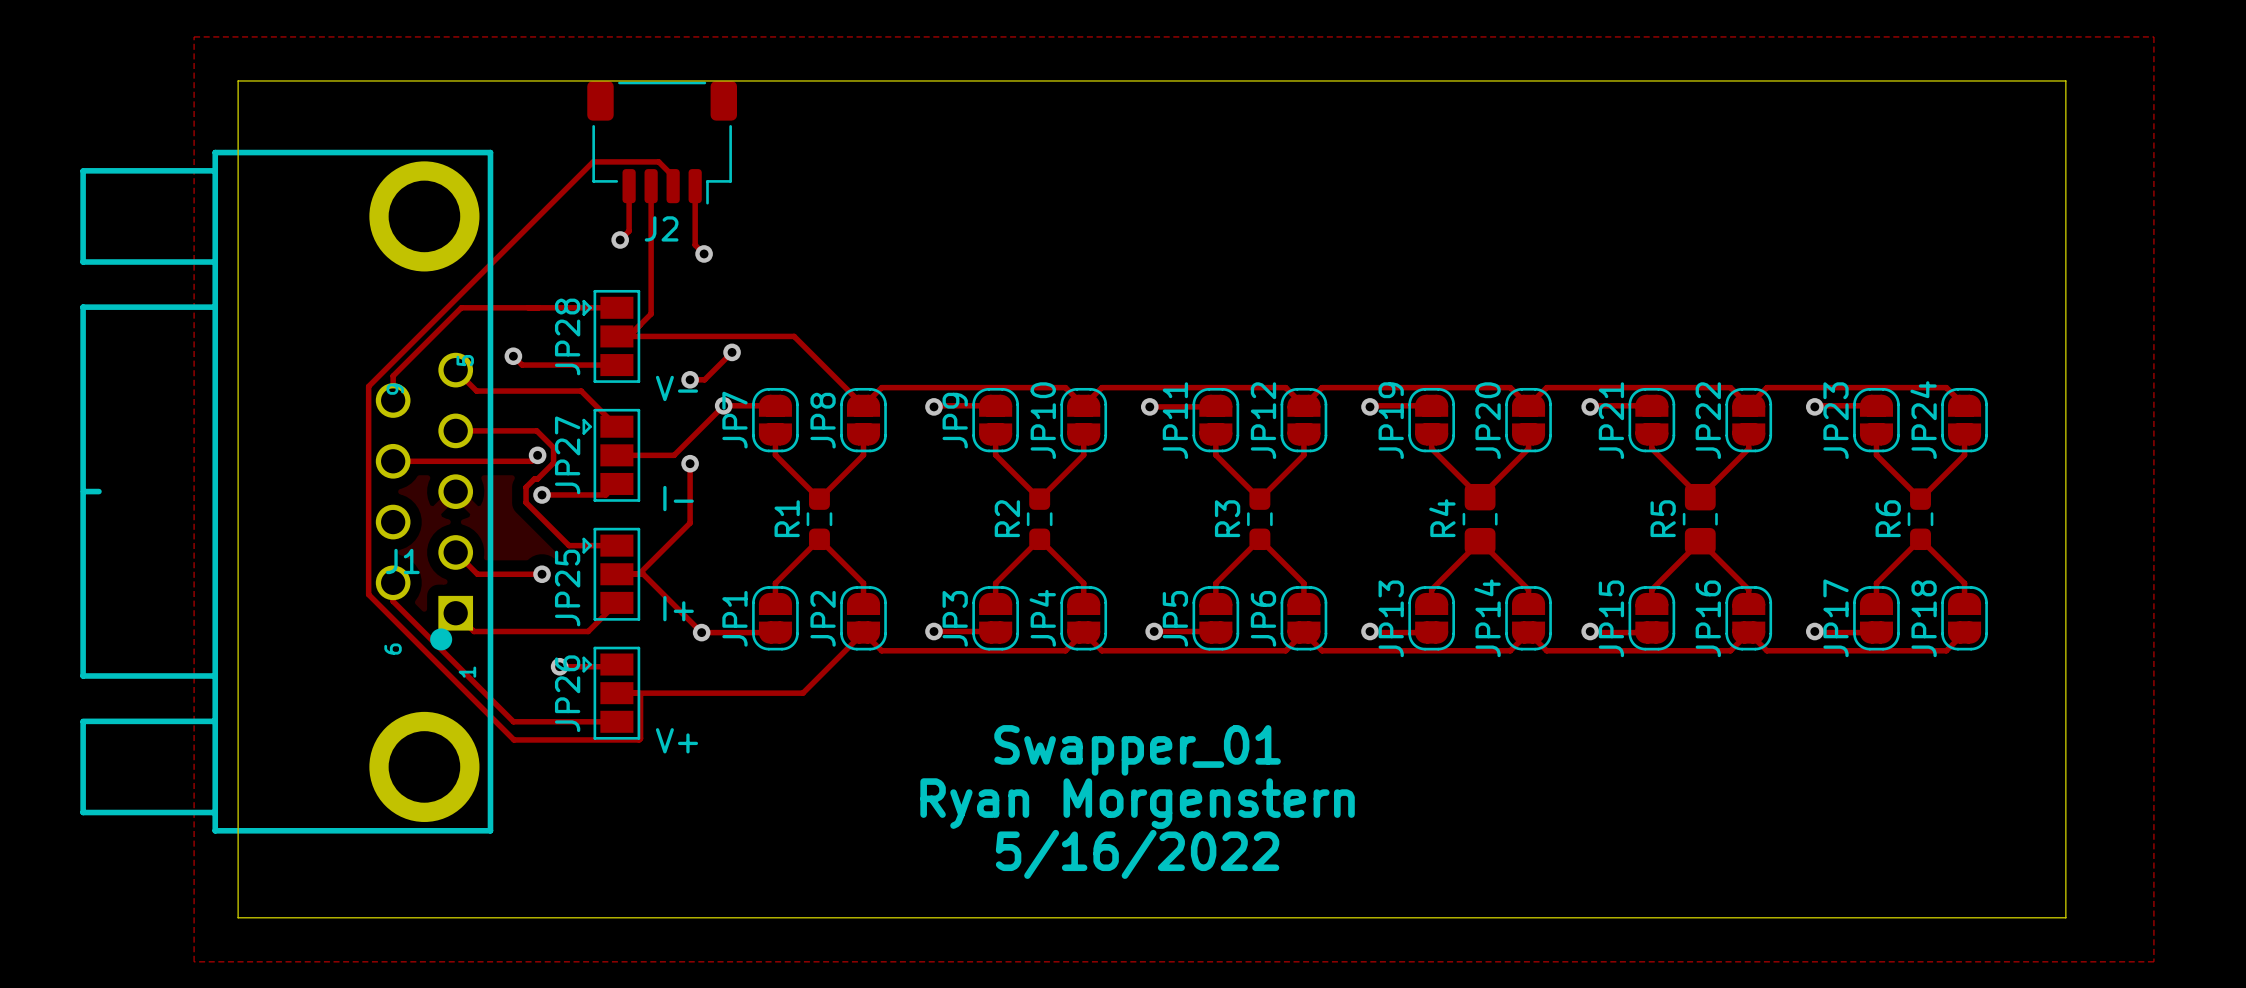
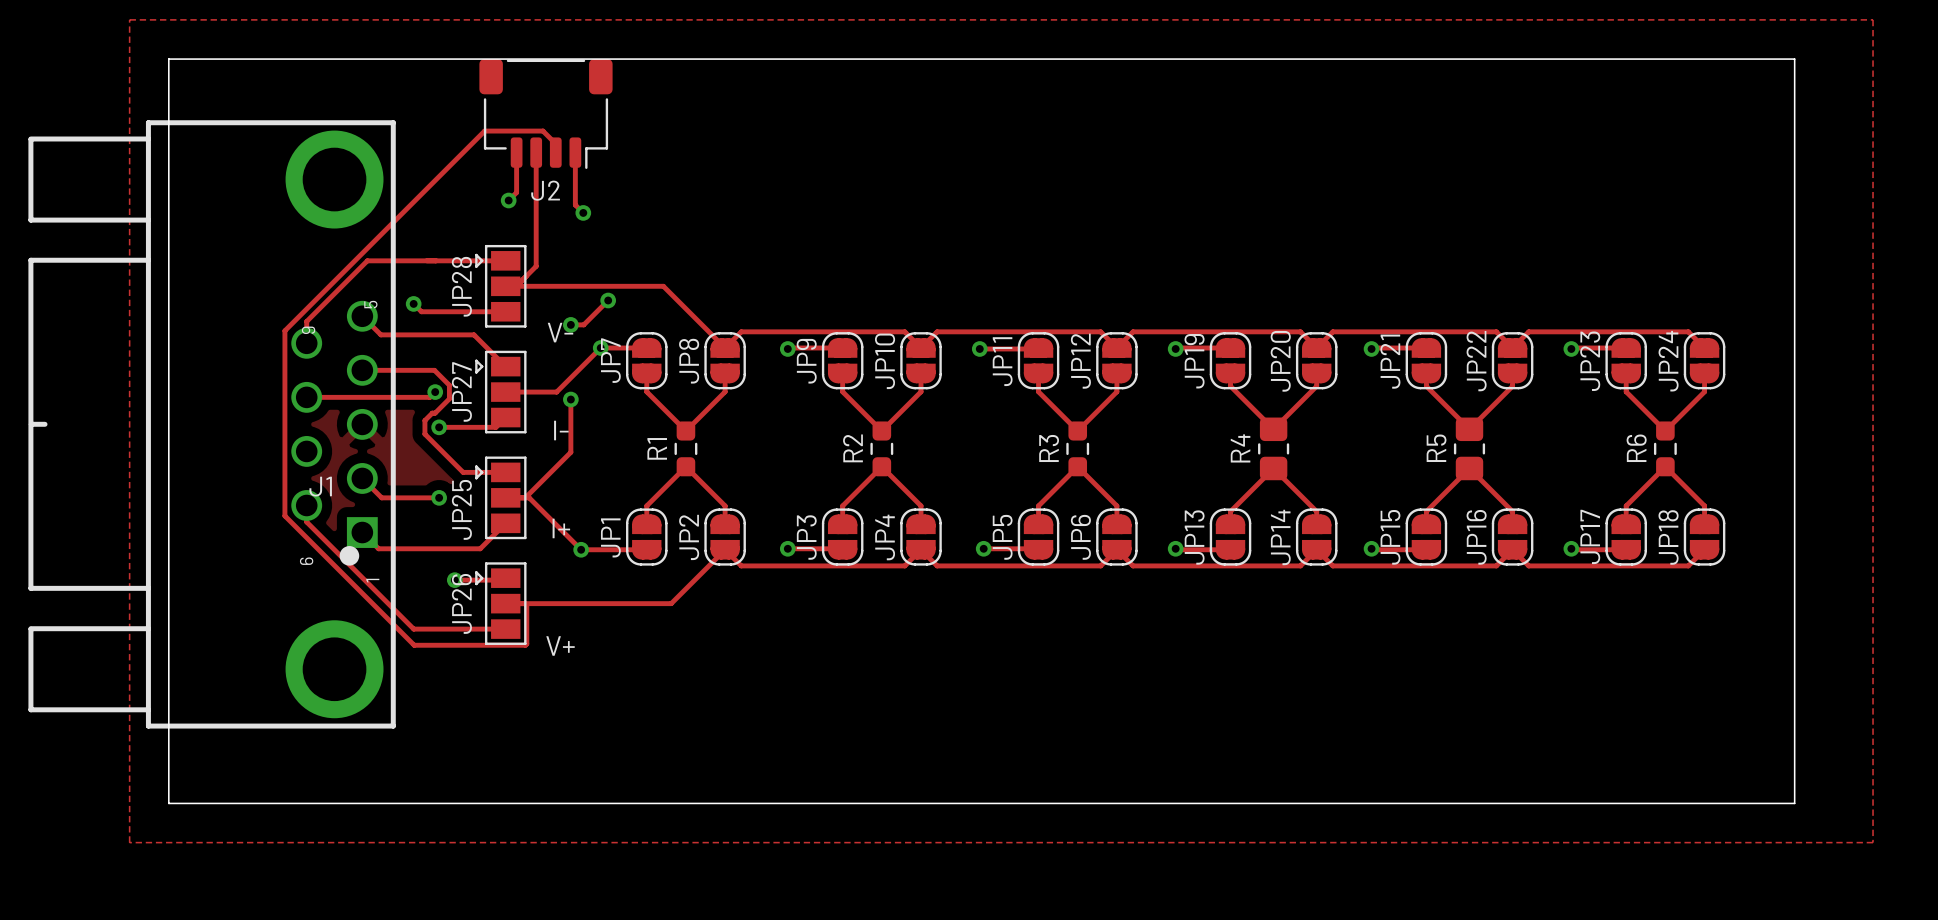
text: Swapper_01 (1137, 750) -> none
text: Ryan Morgenstern (1137, 803) -> none
text: 5/16/2022 (1137, 854) -> none

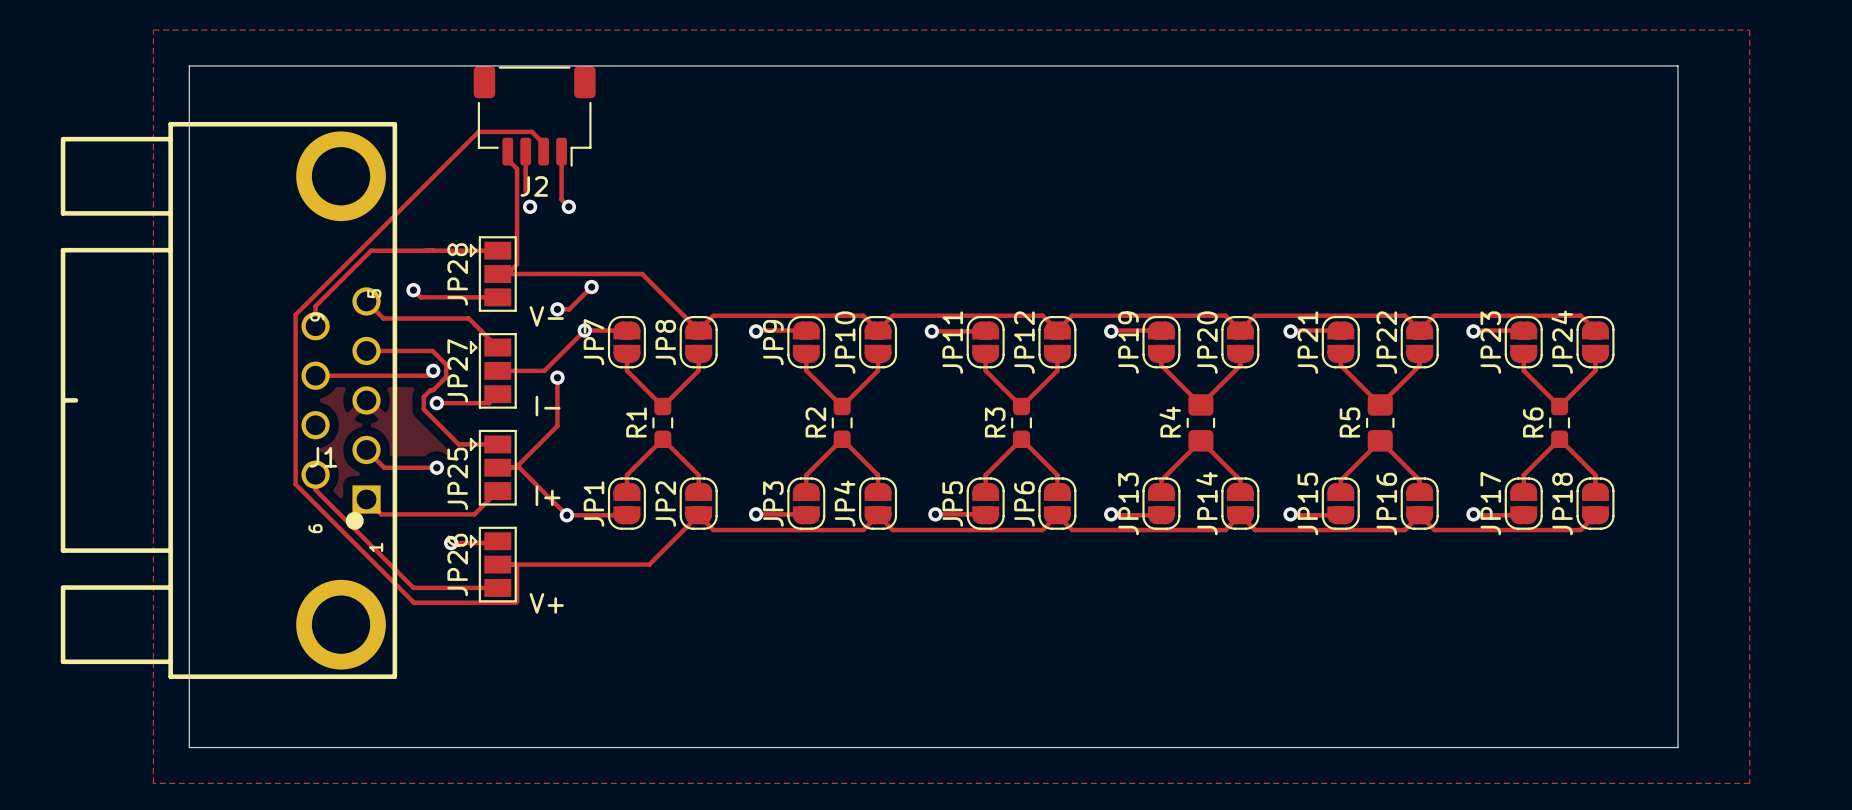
track: (516, 161) (516, 192) (508, 200) -> none
track: (536, 197) (536, 266) (526, 275) -> (507, 159) (517, 168) (517, 264)
via position: (508, 200) -> (530, 206)

